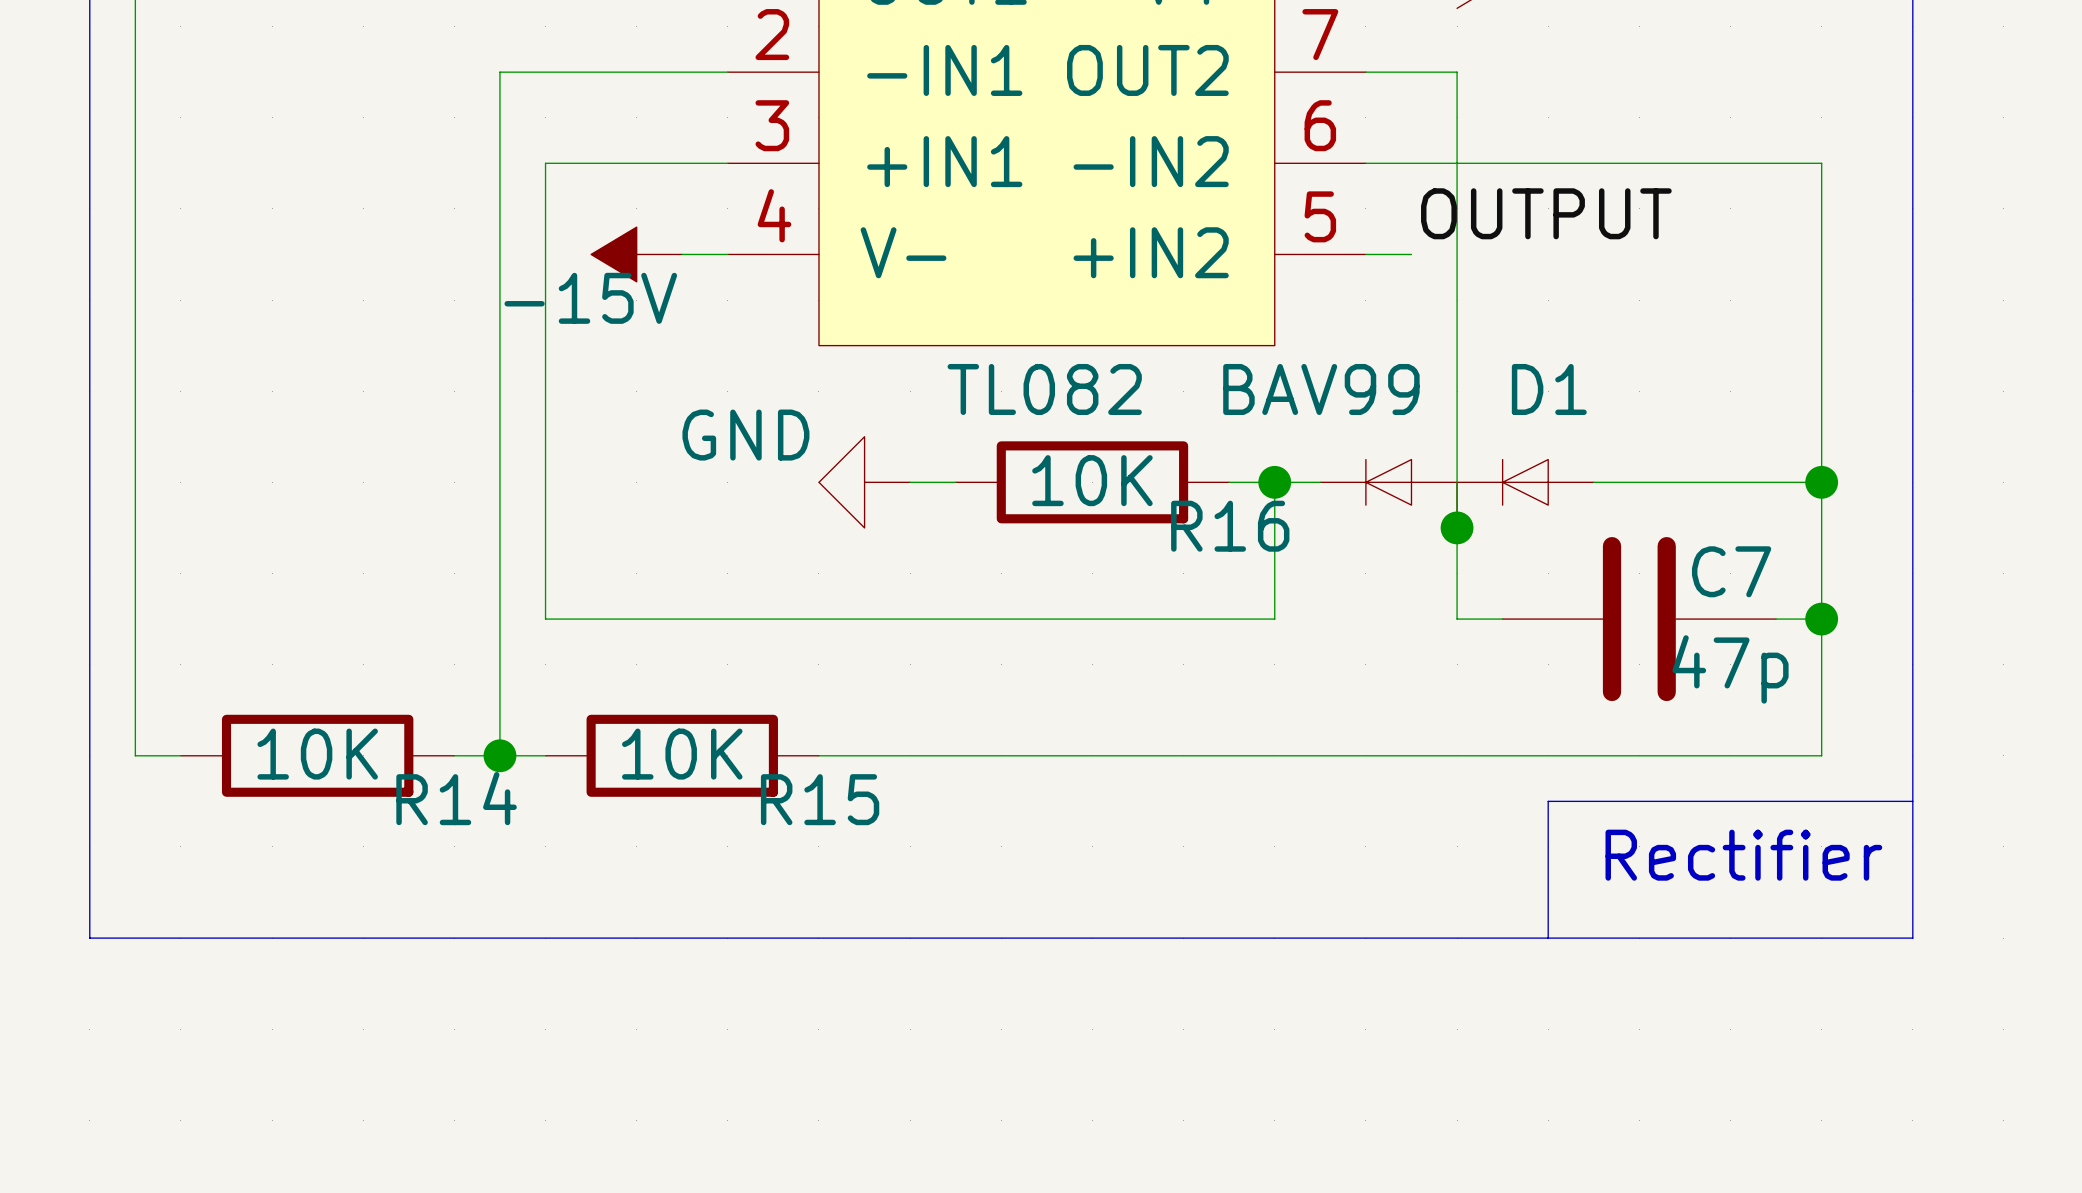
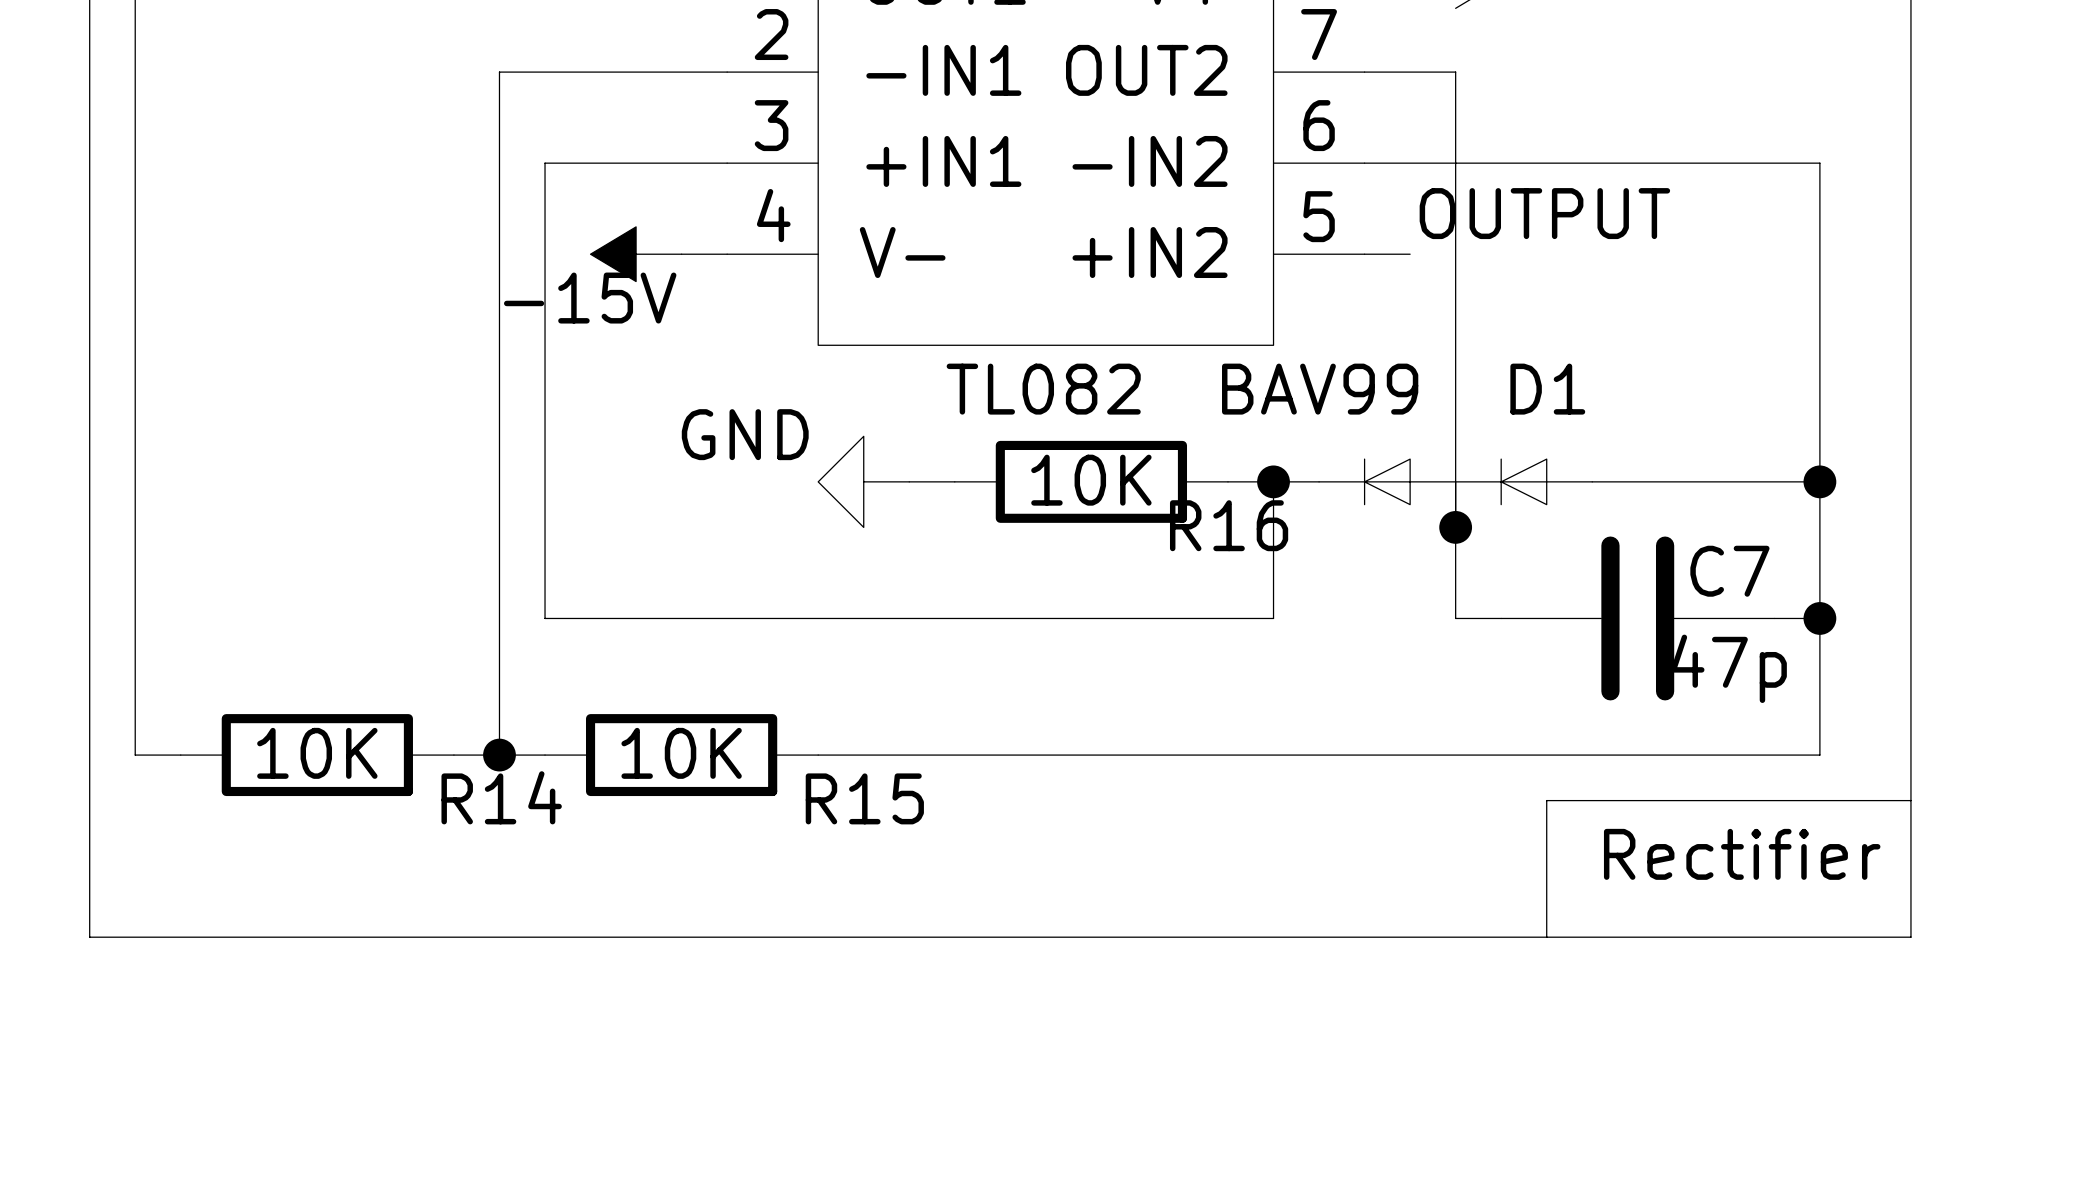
R14 name position: R14 (456, 798) -> R14 (501, 797)
R15 name position: R15 (820, 799) -> R15 (864, 798)

